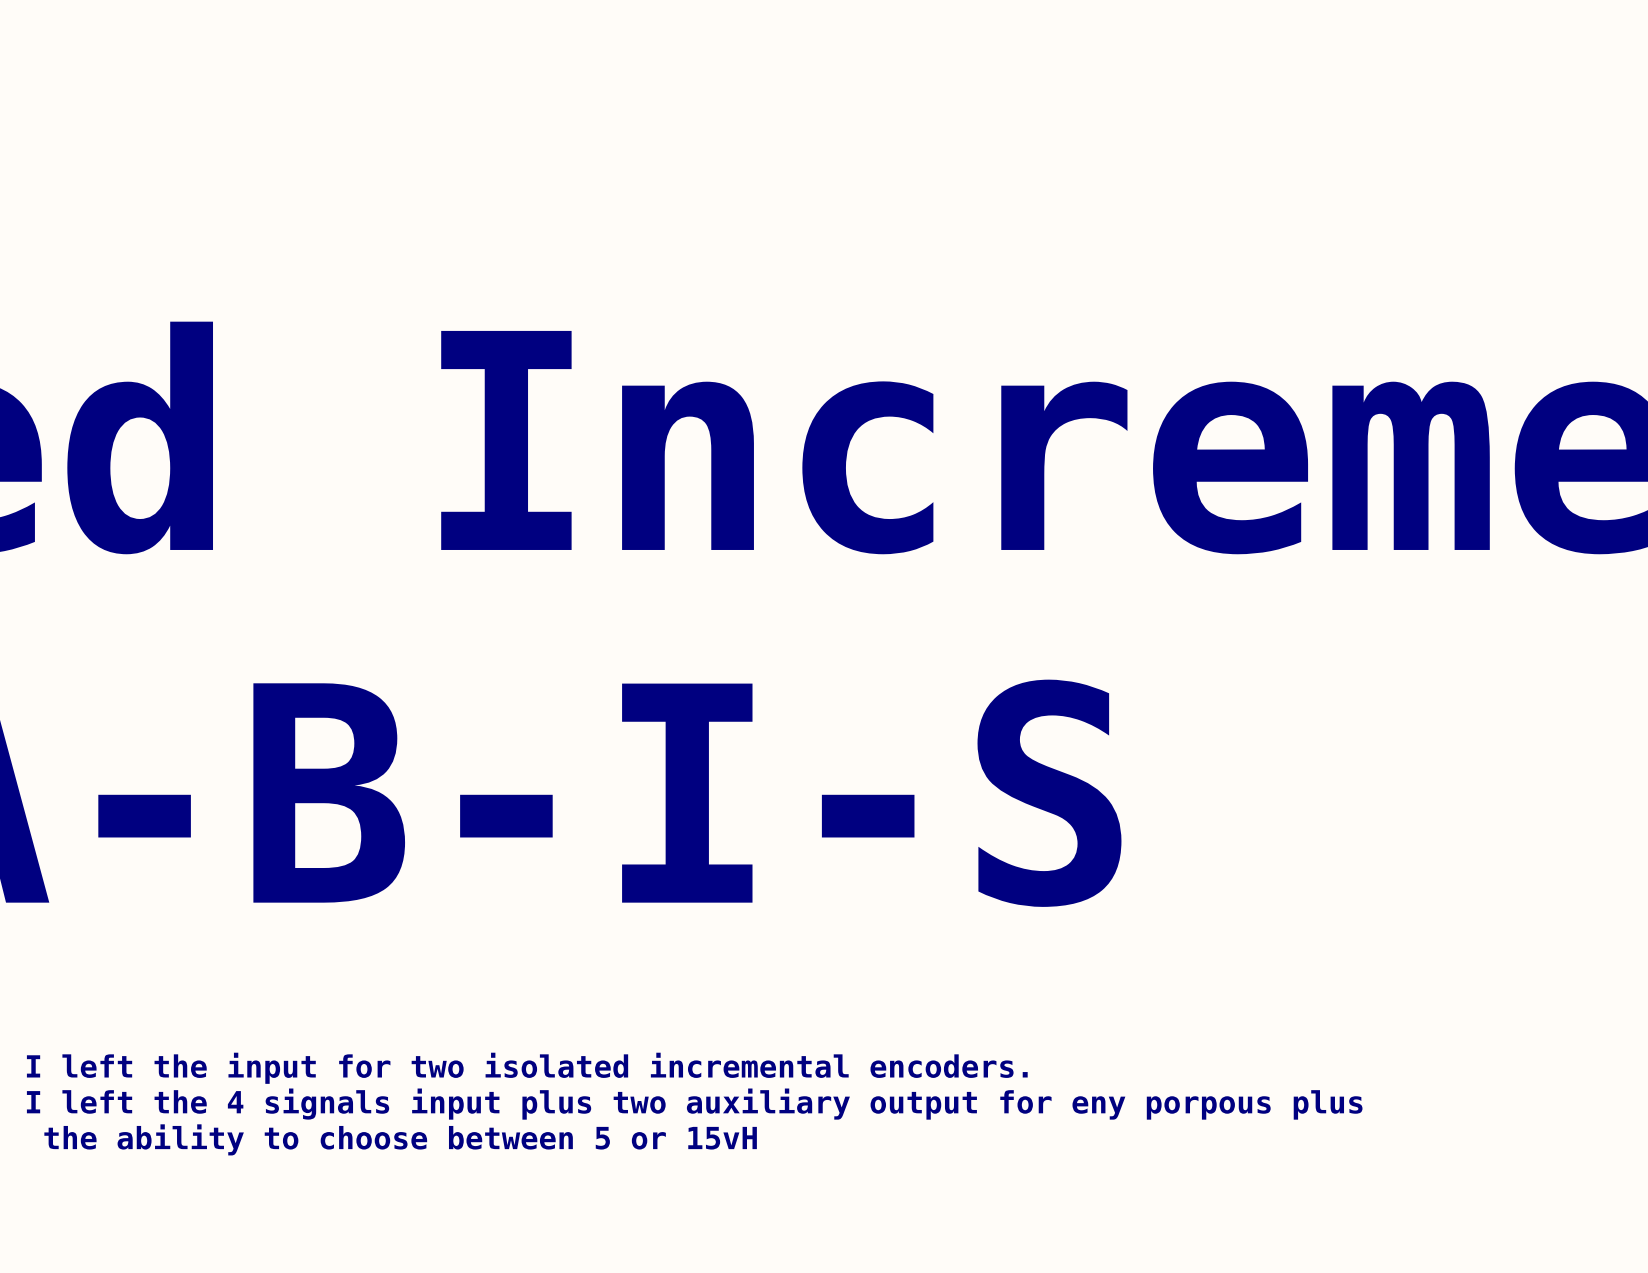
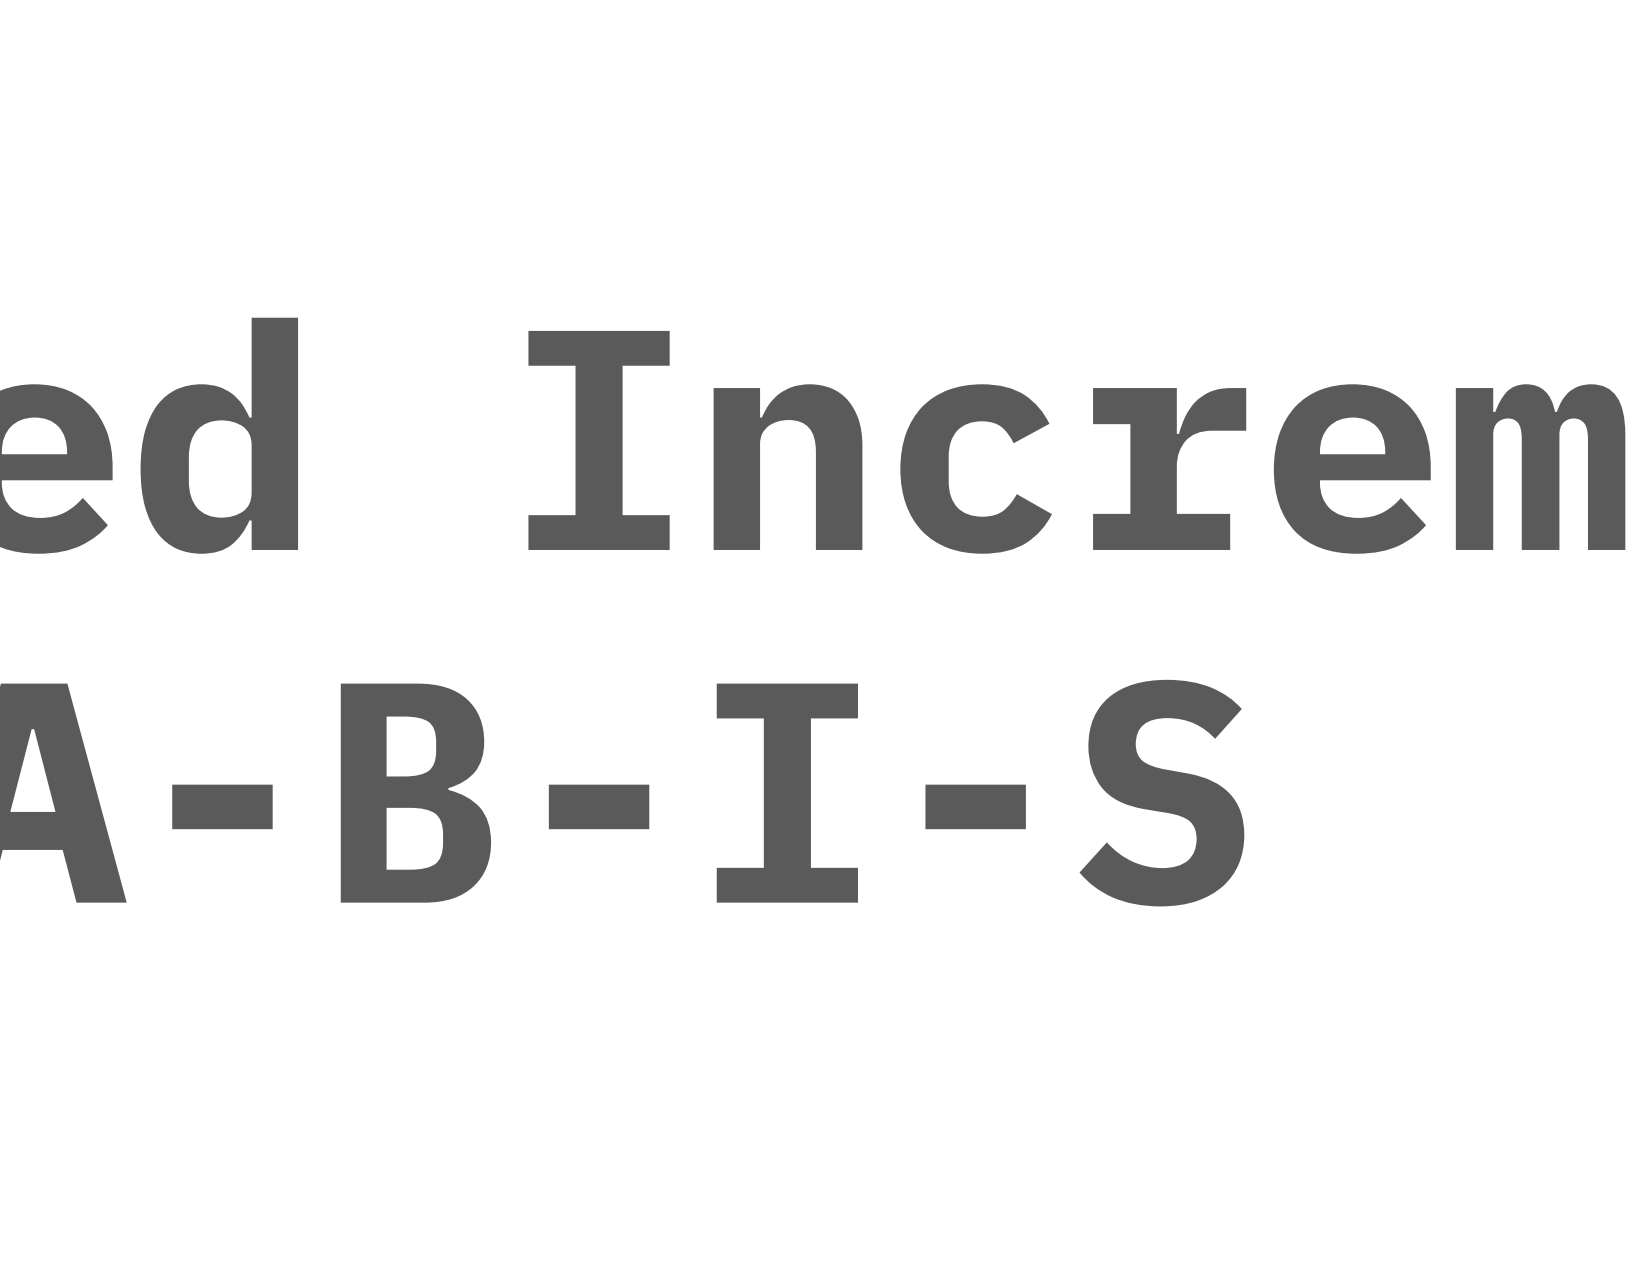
text: I left the input for two isolated incremental encoders. (527, 1068) -> none
text: I left the 4 signals input plus two auxiliary output for eny porpous plus (694, 1104) -> none
text: the ability to choose between 5 or 15vH (400, 1139) -> none

